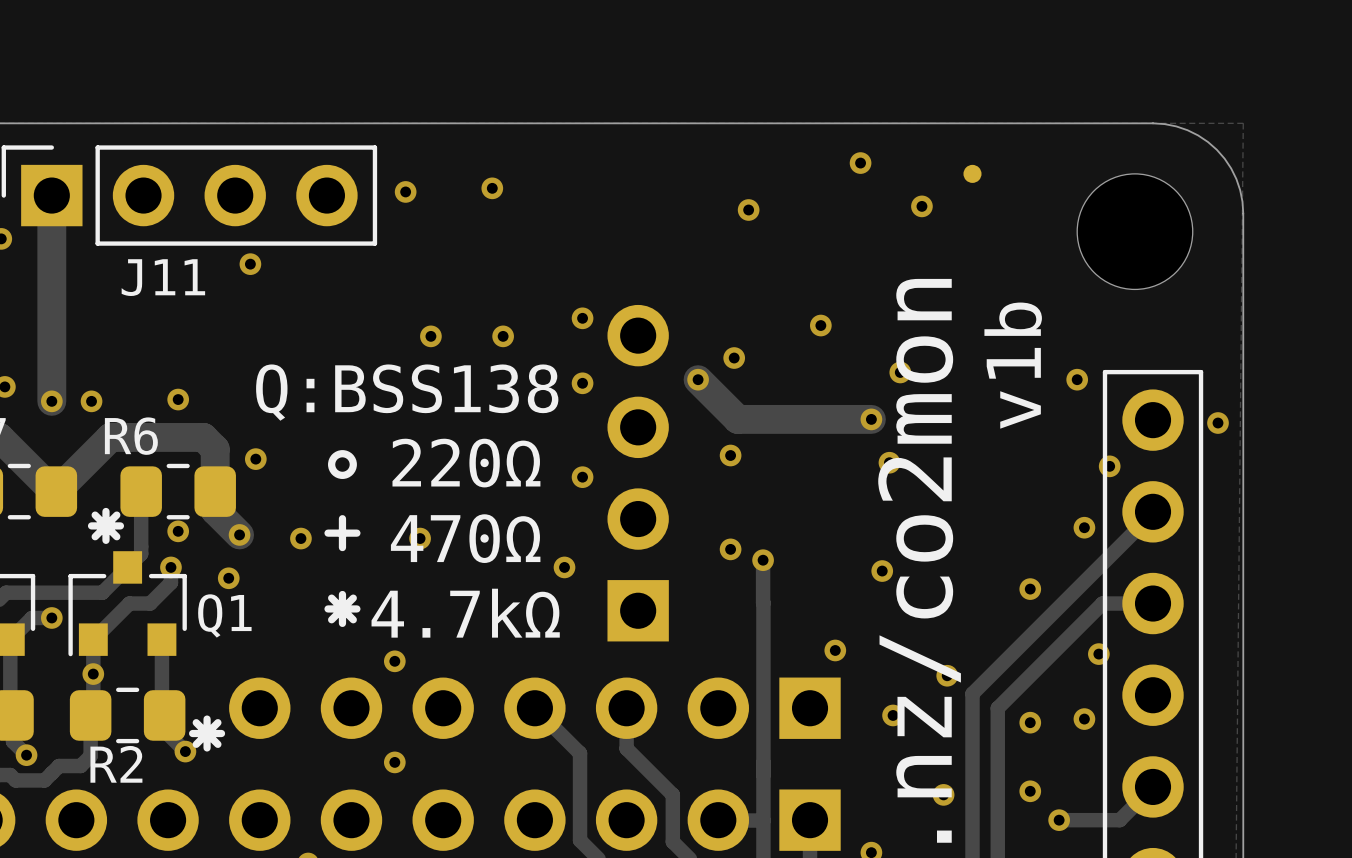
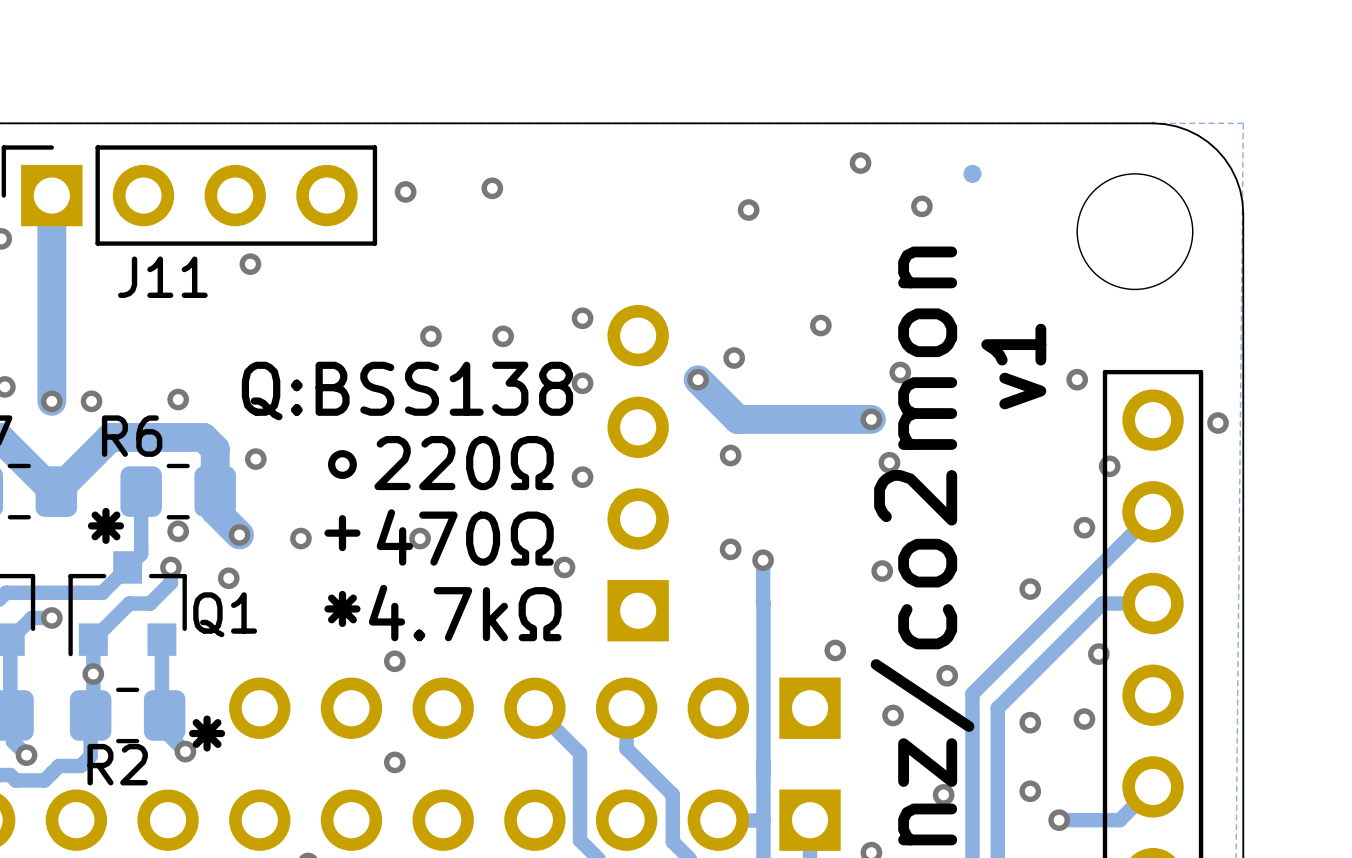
text: v1b (1013, 365) -> v1 (1013, 366)

